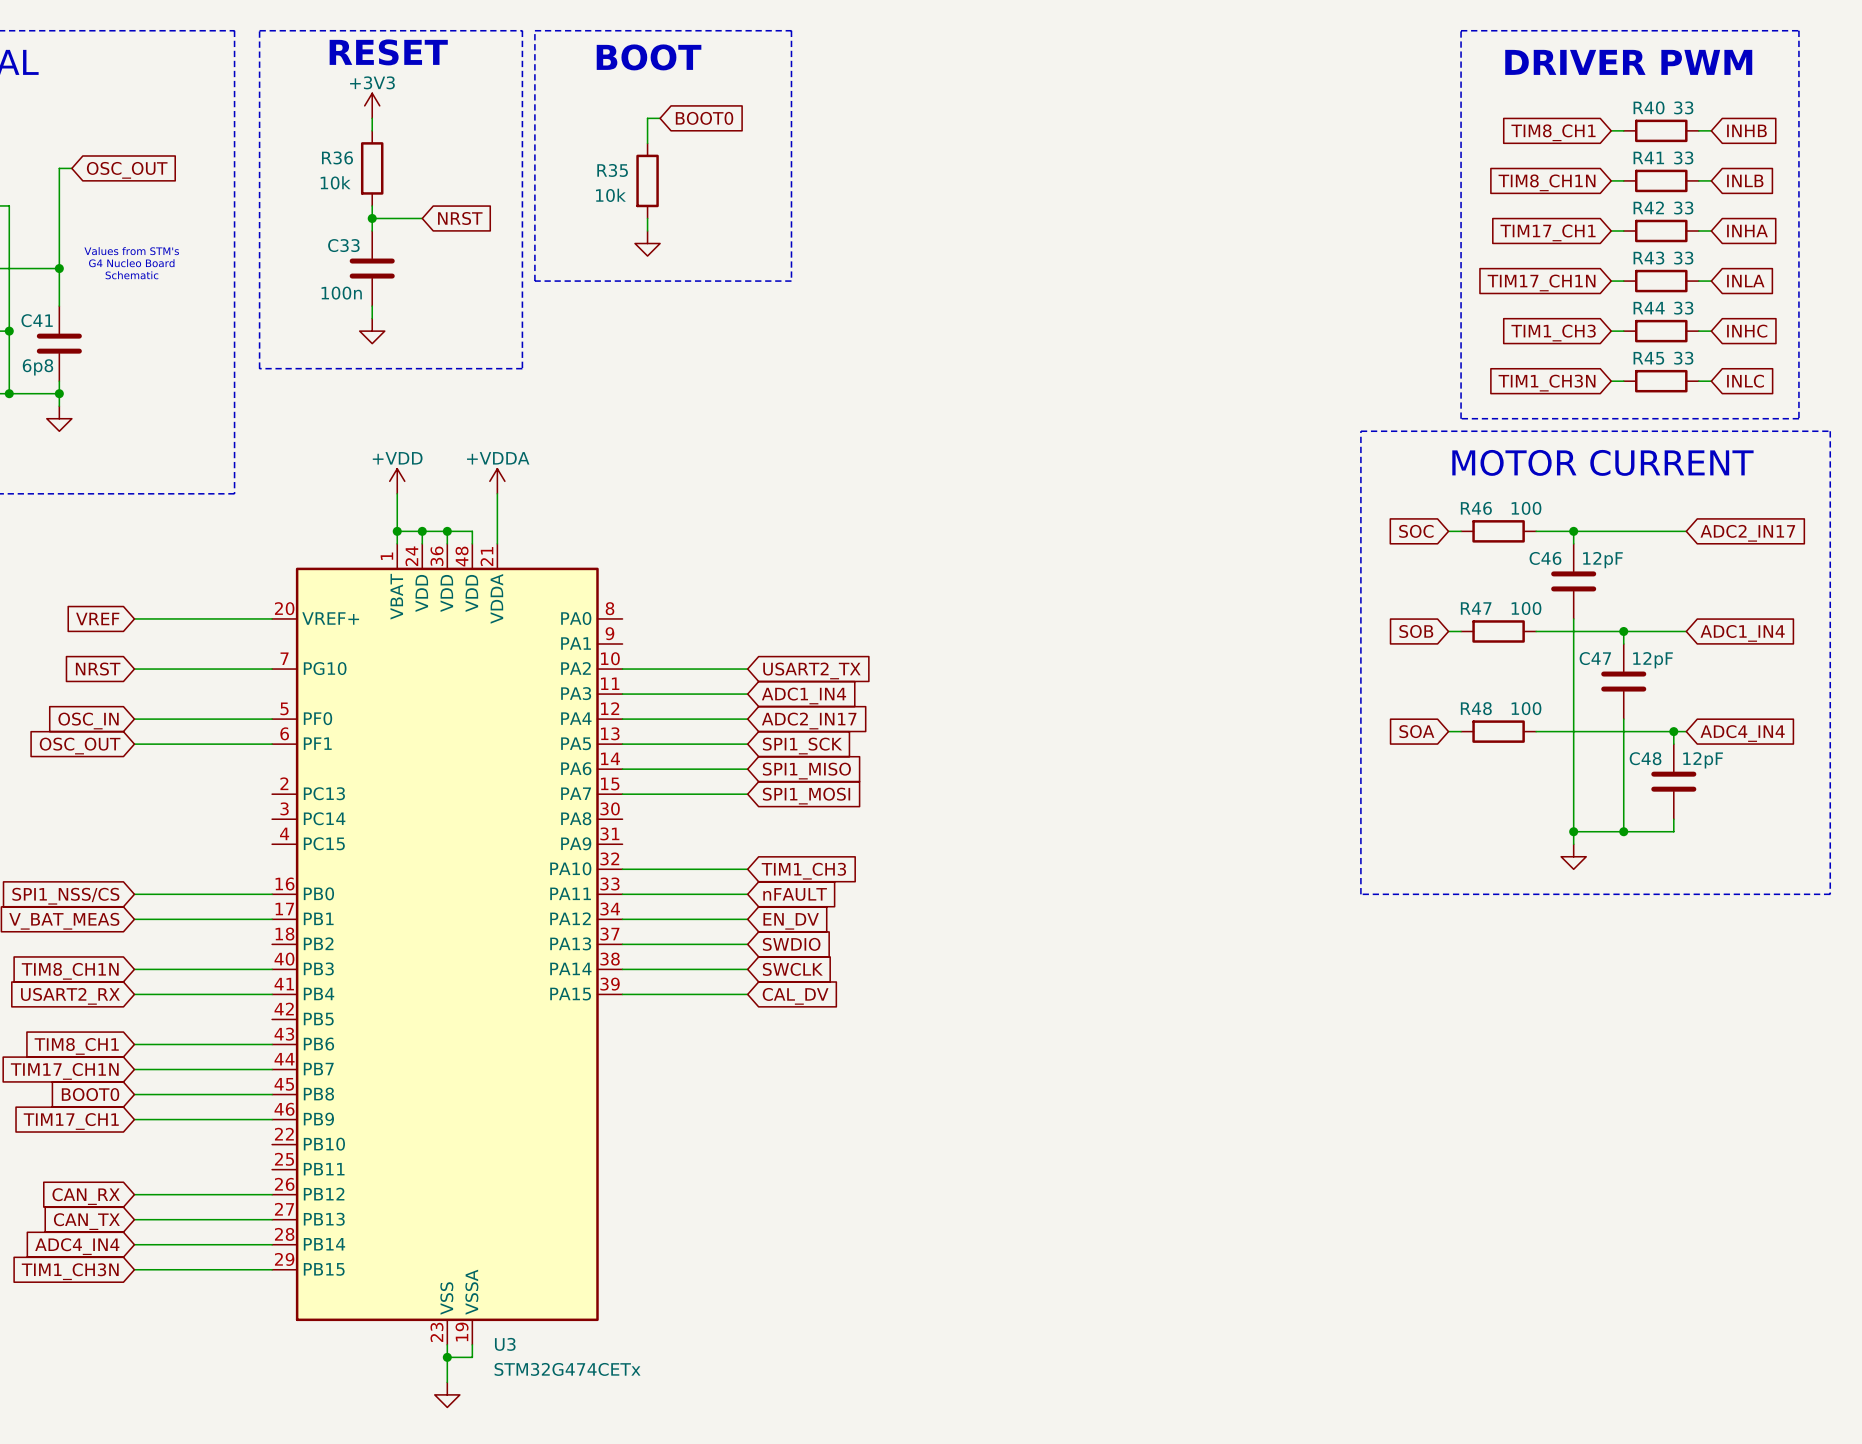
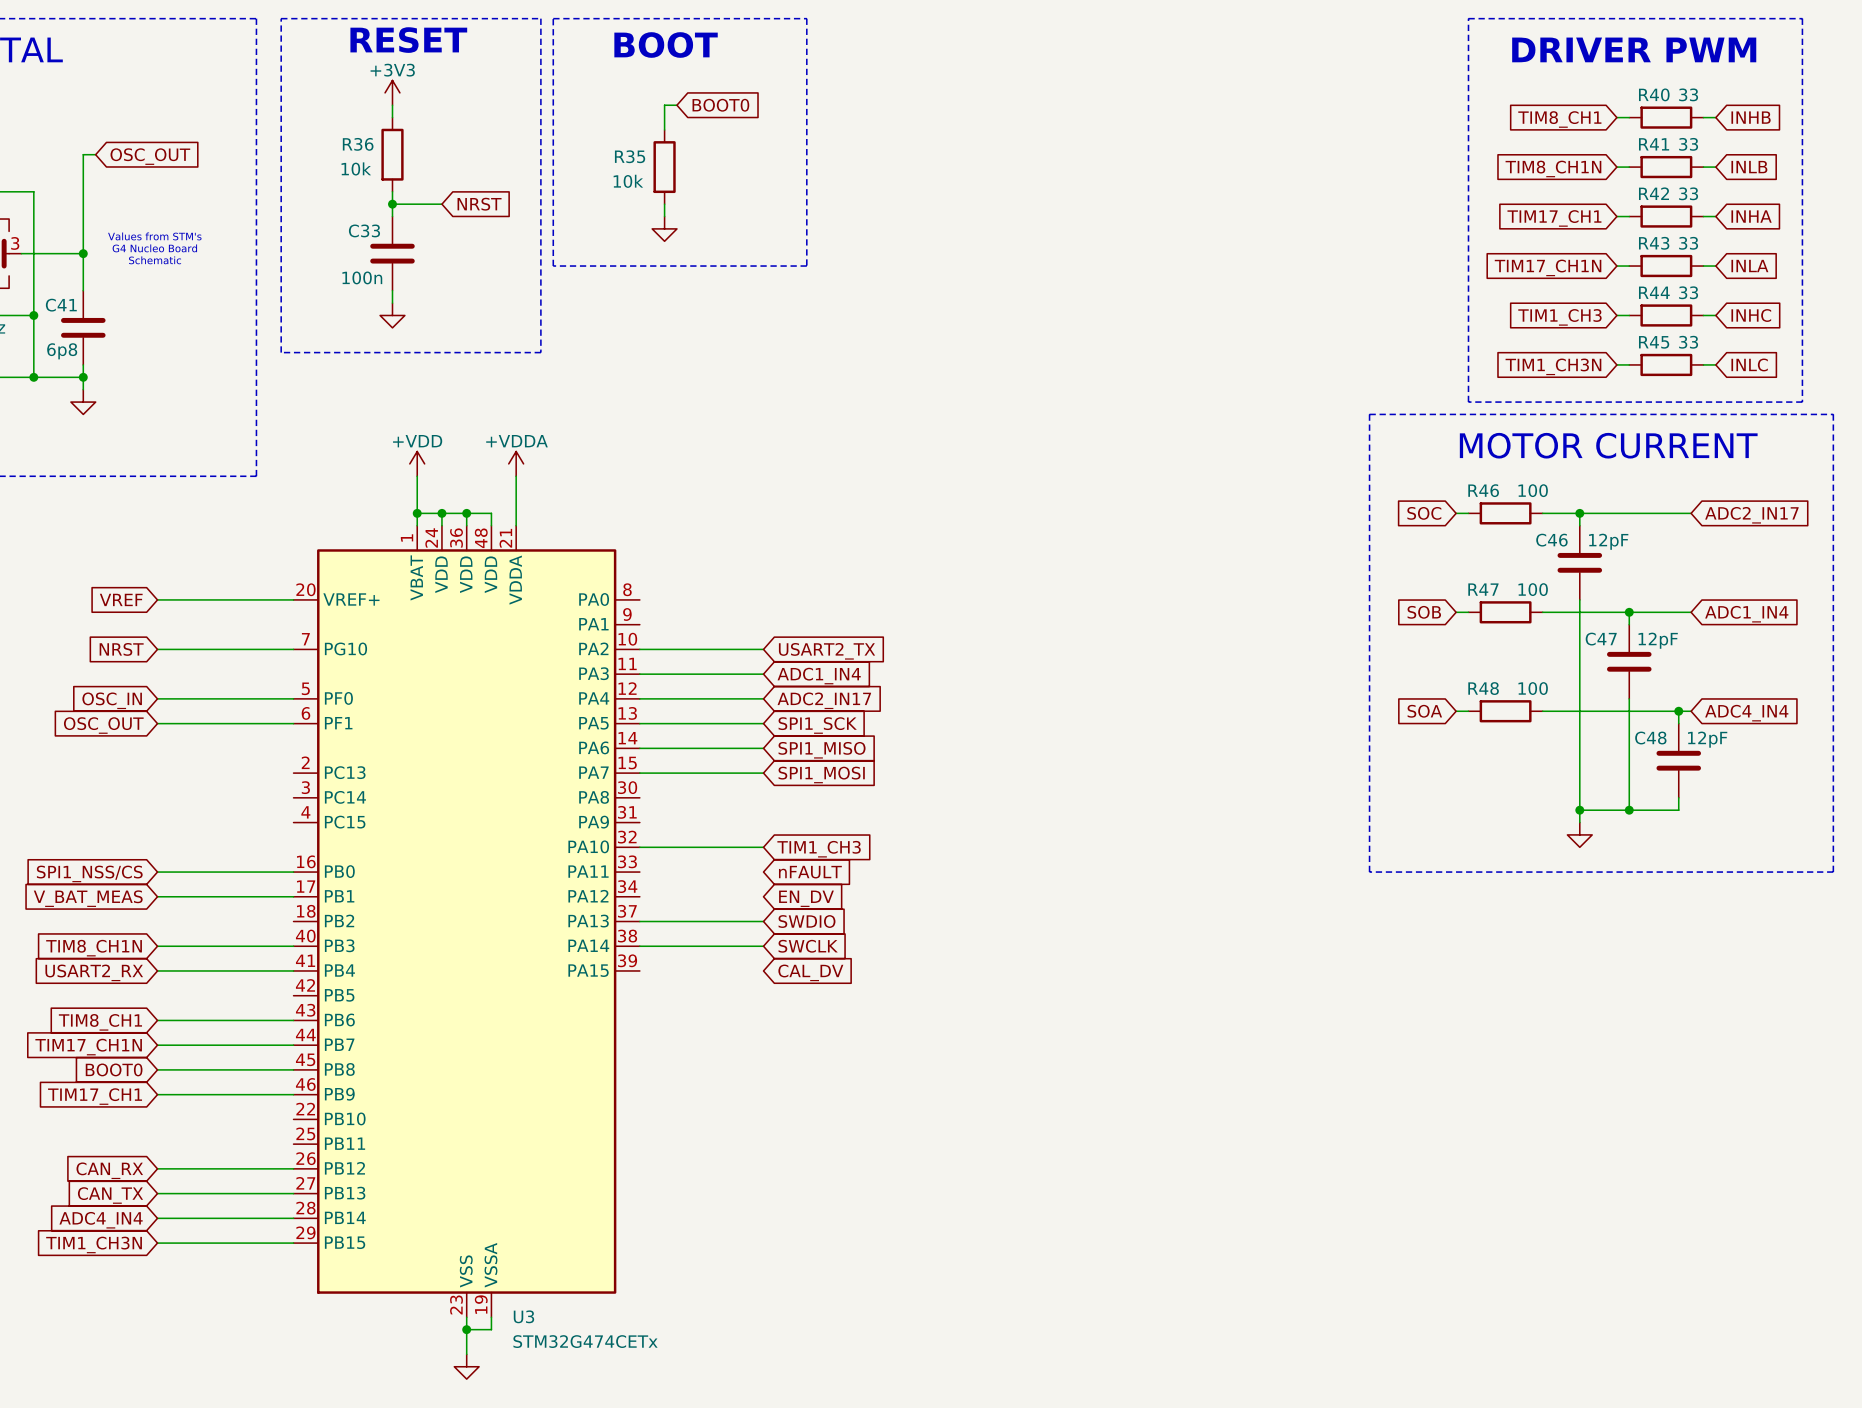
wire: (622, 894) (747, 894) -> none
wire: (622, 919) (747, 919) -> none
wire: (622, 994) (747, 994) -> none

